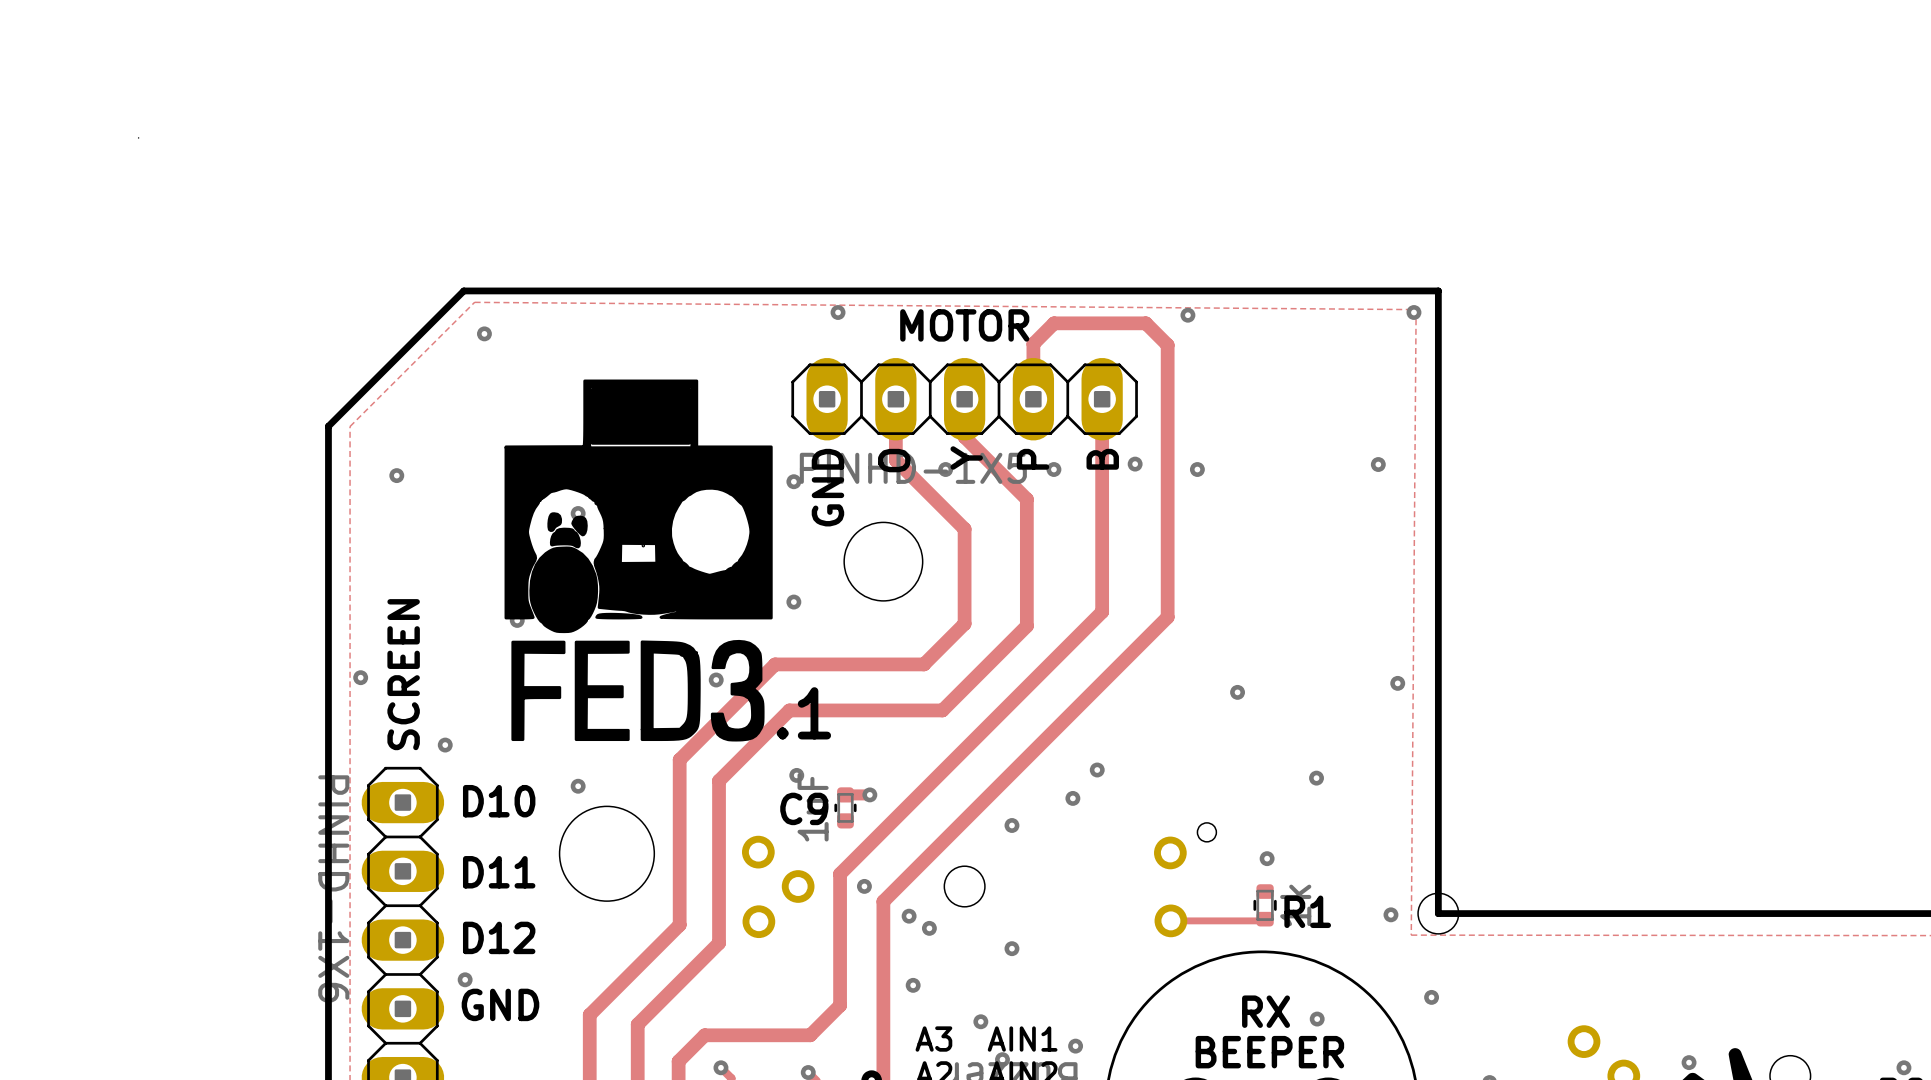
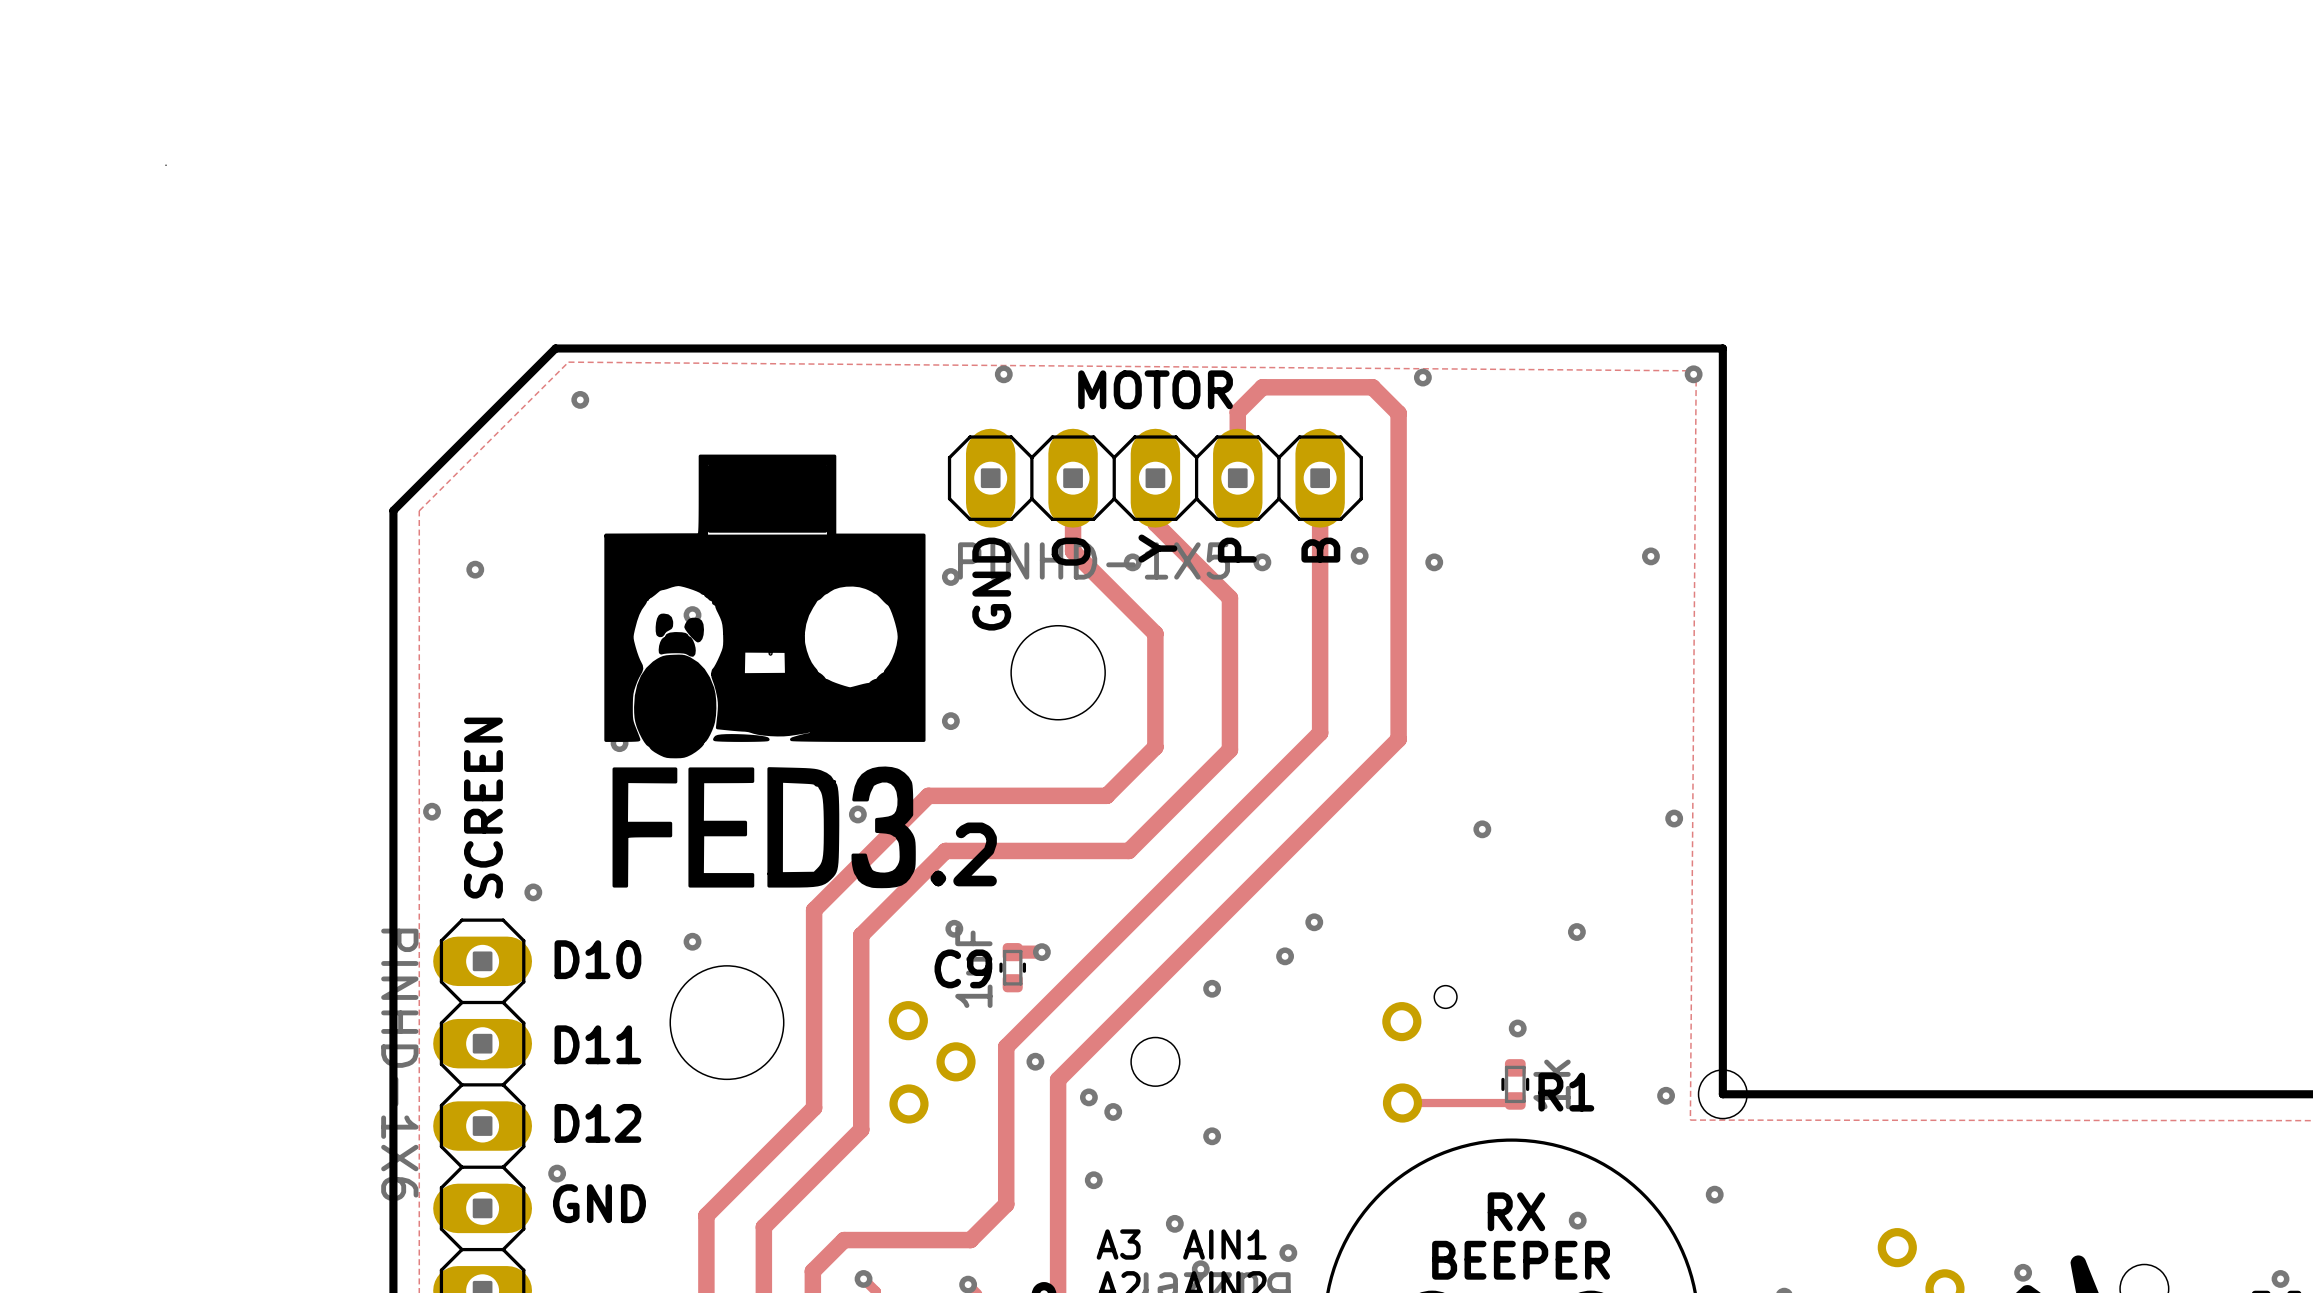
text: .1 (803, 713) -> .2 (963, 854)

